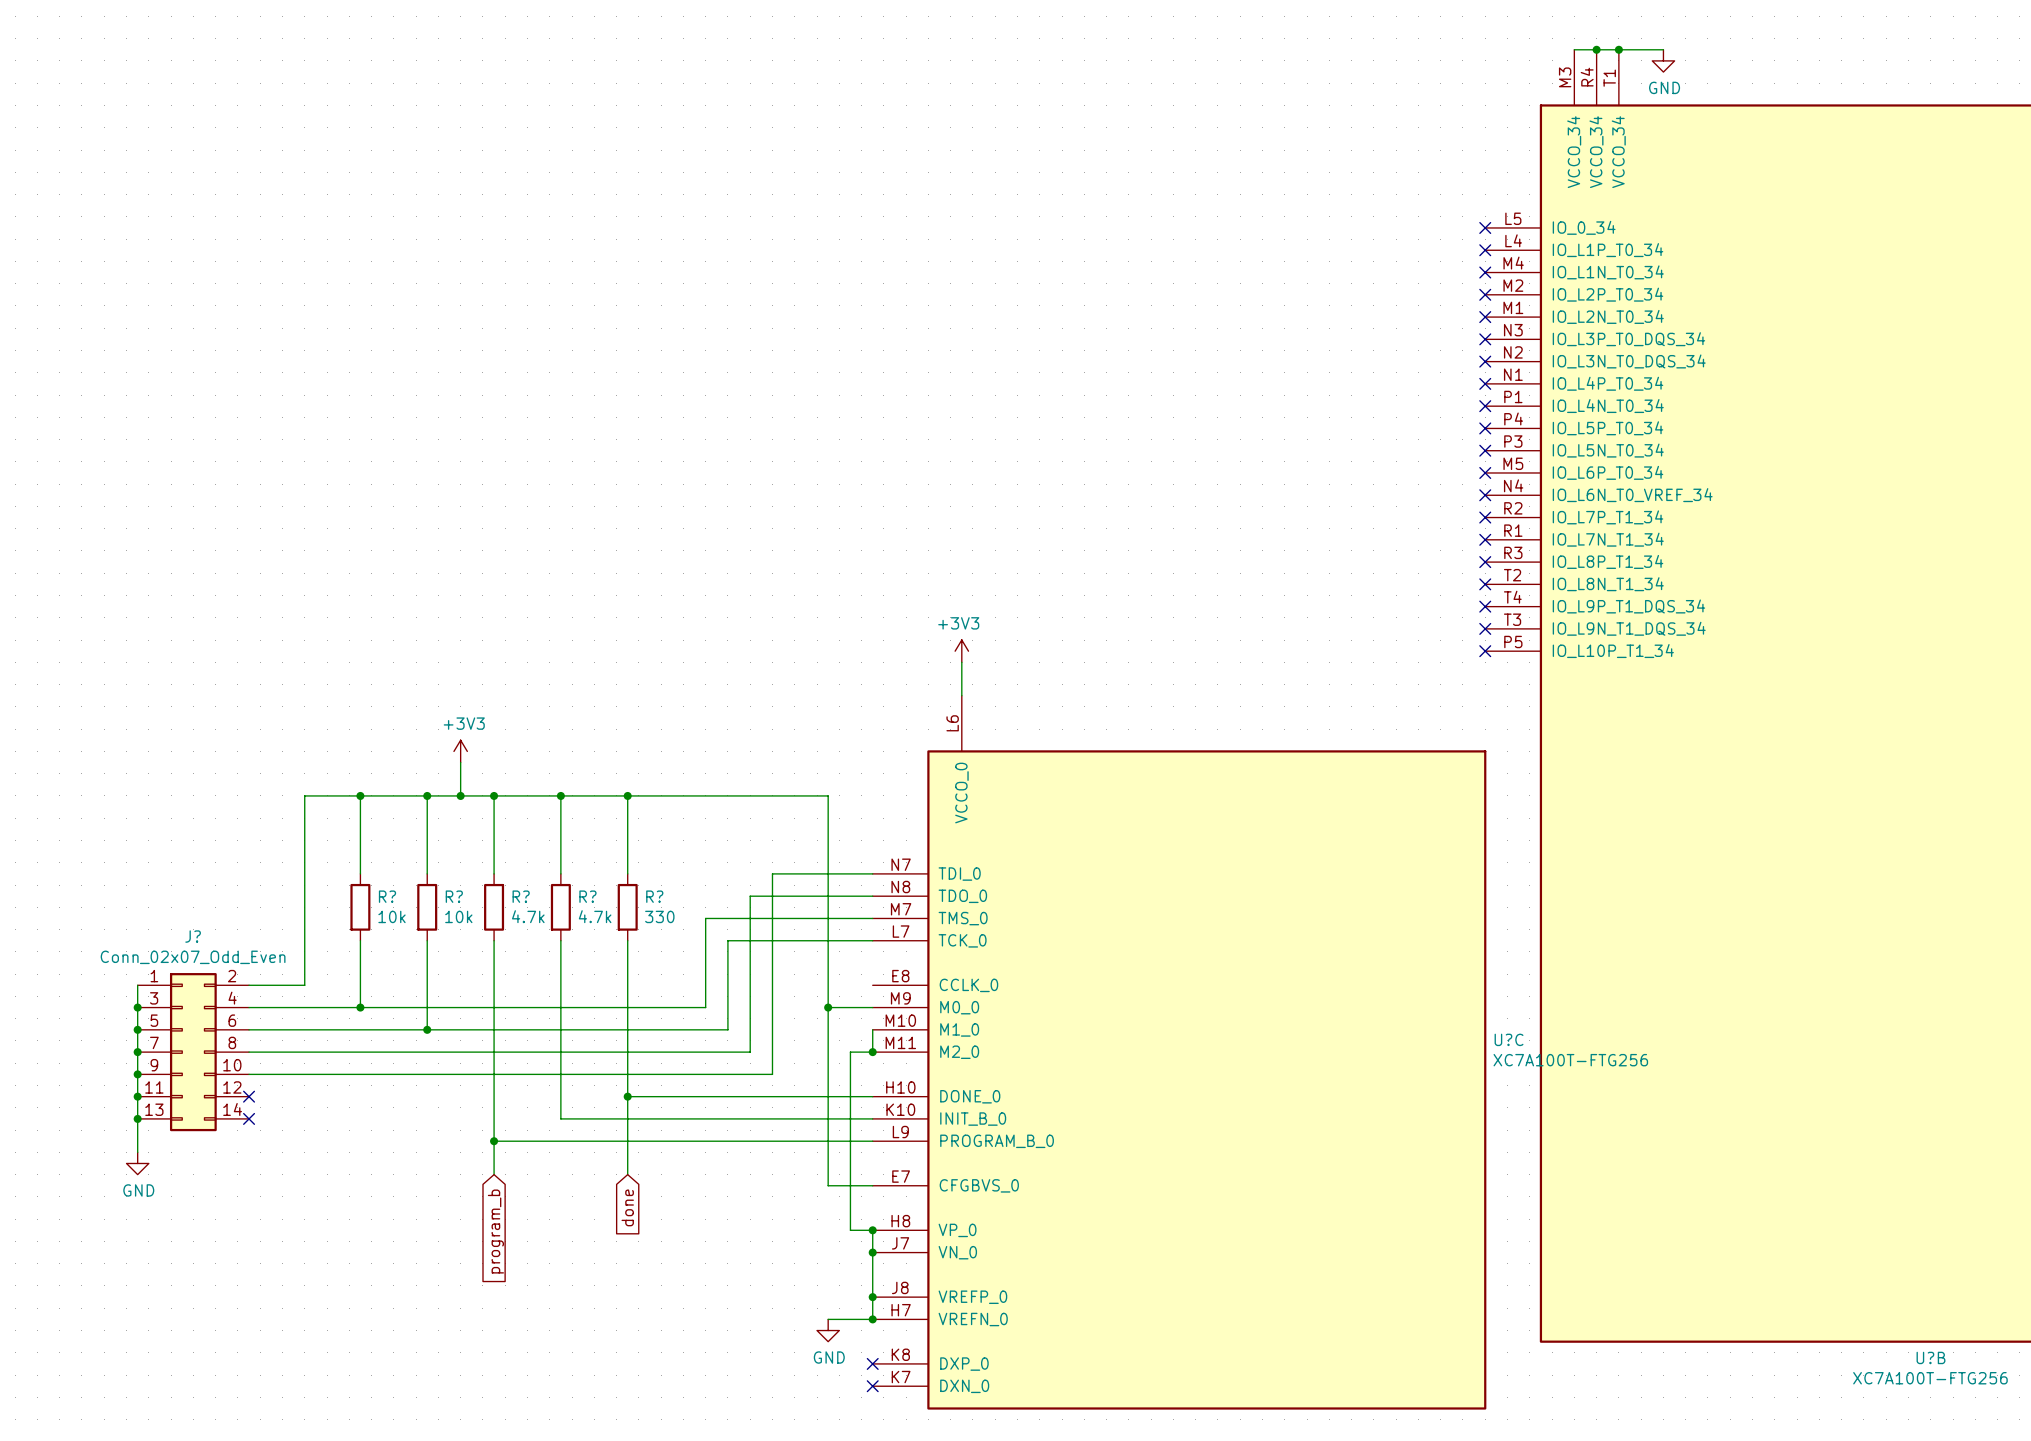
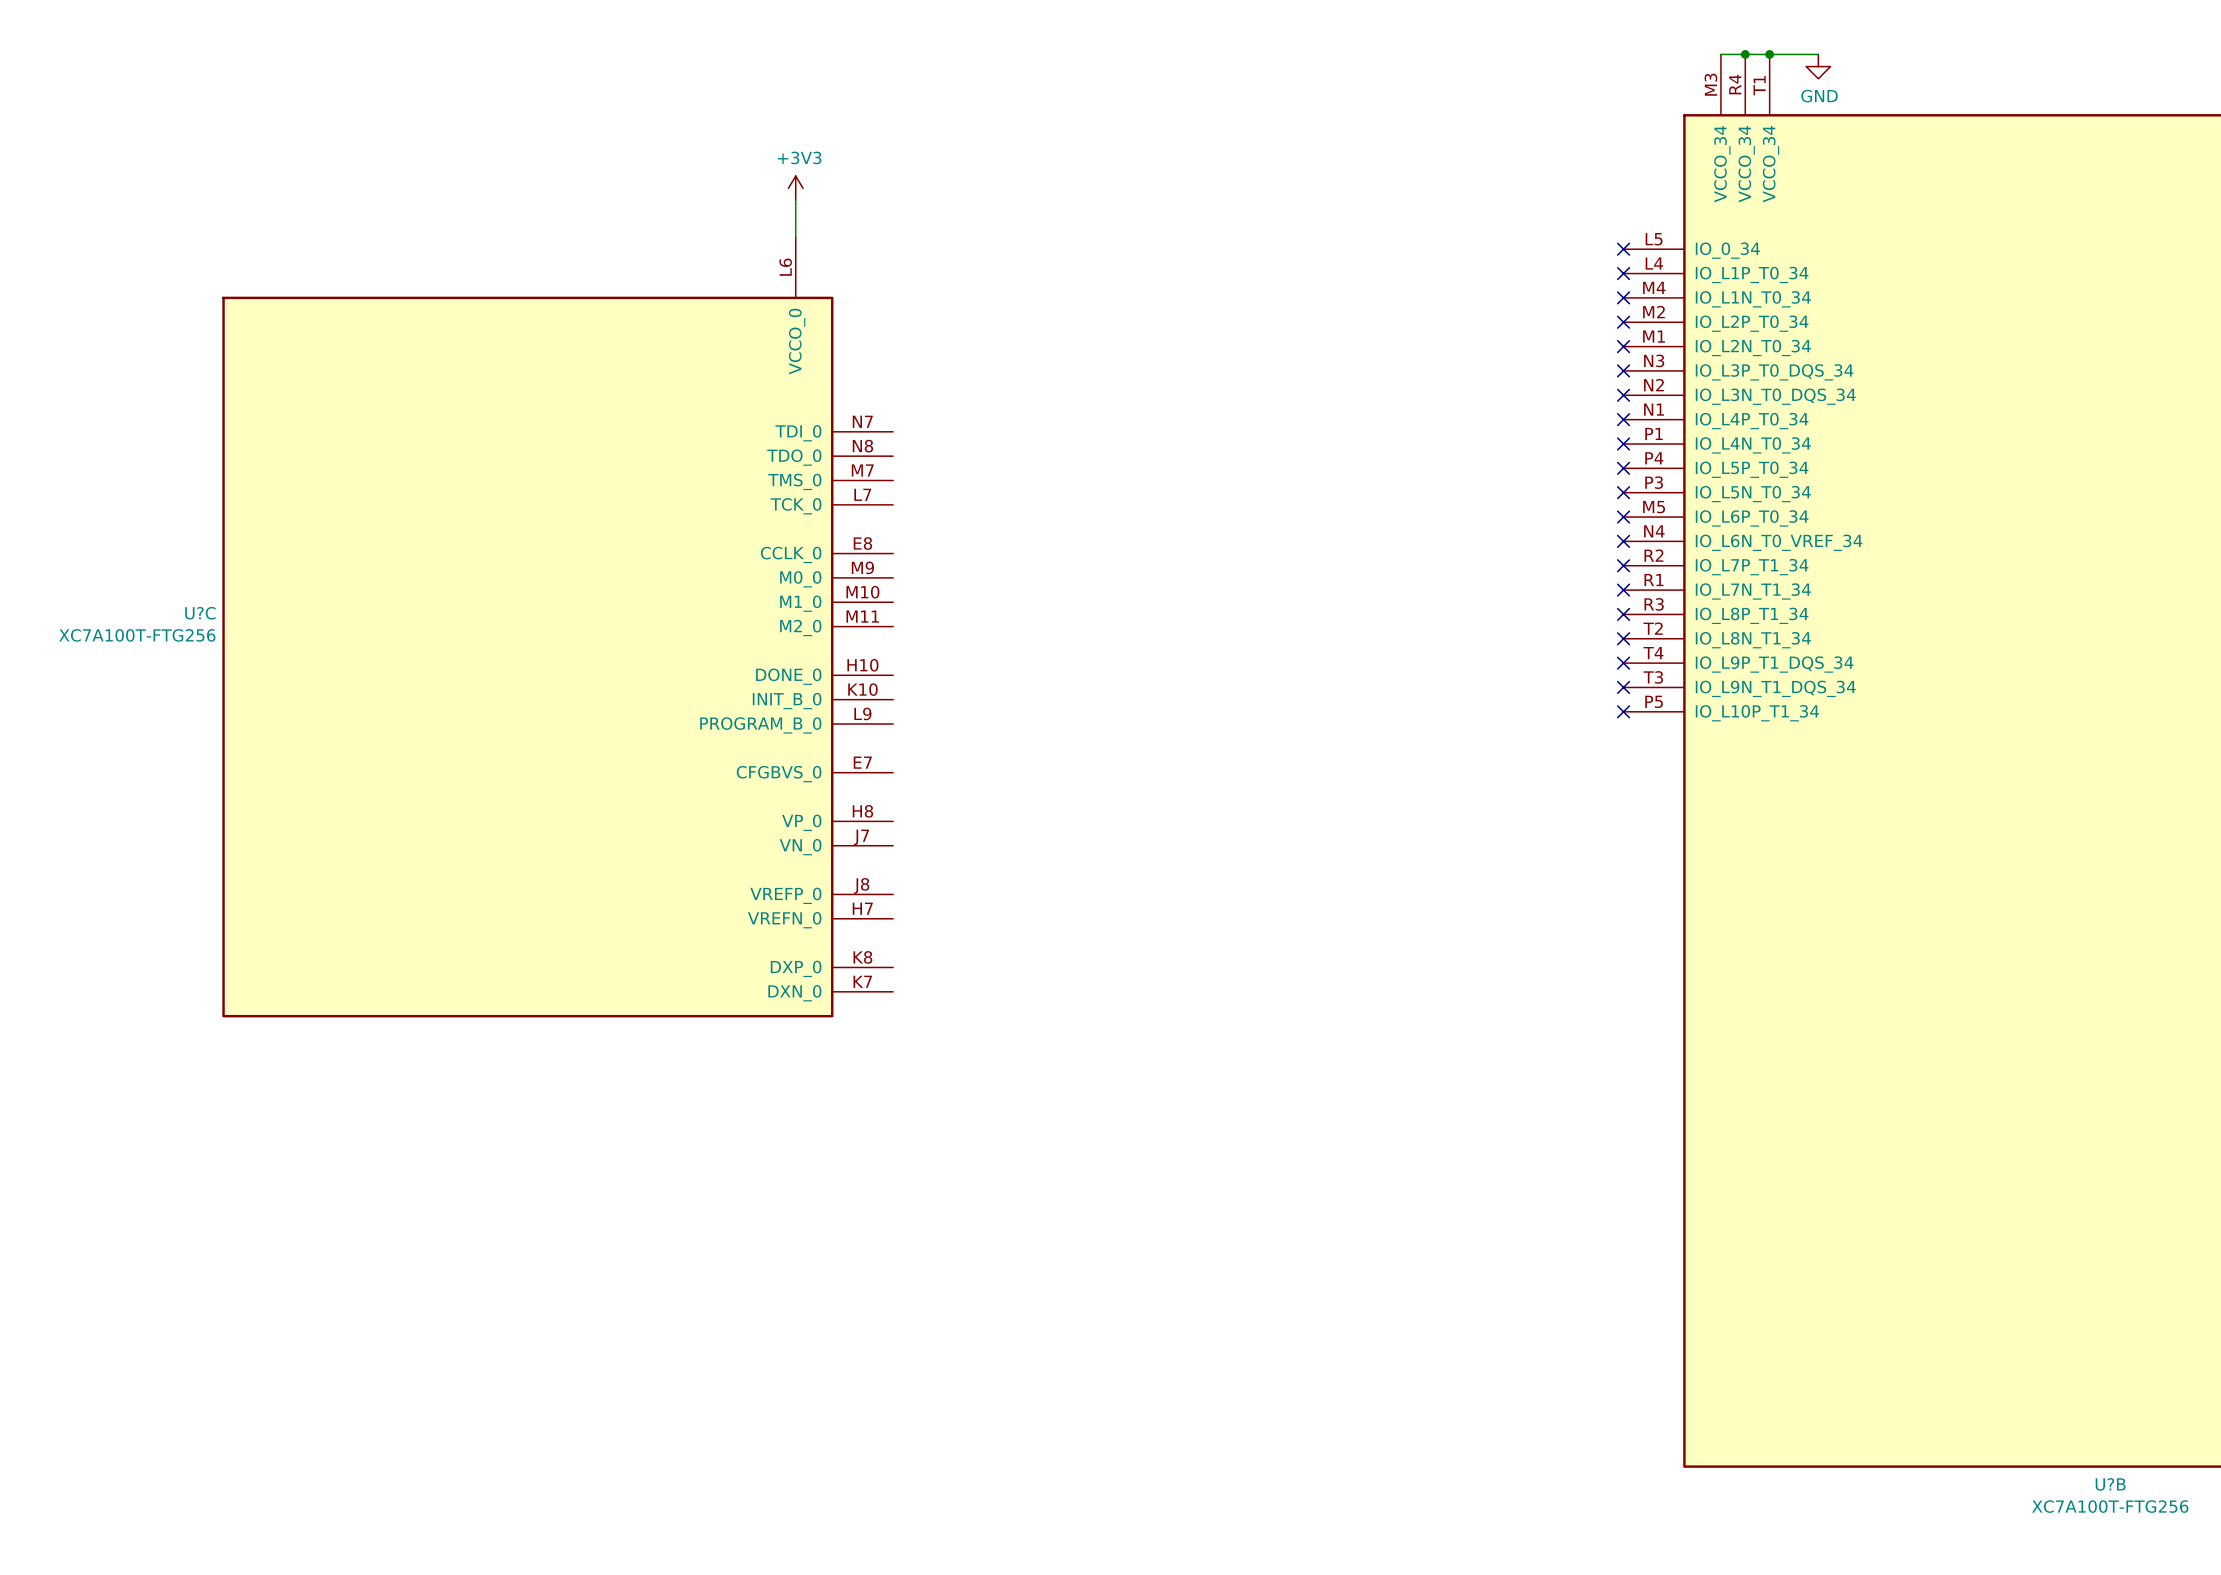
power symbol: none -> +3V3 (795, 188)
wire: none -> (795, 200) (795, 237)
U?C: none -> XC7A100T-FTG256 (557, 627)
power symbol: +3V3 (961, 651) -> none
wire: (961, 662) (961, 695) -> none
power symbol: +3V3 (460, 751) -> none
junction: (360, 795) -> none
junction: (427, 795) -> none
junction: (460, 795) -> none
junction: (494, 795) -> none
junction: (560, 795) -> none
junction: (627, 795) -> none
wire: (872, 873) (772, 873) (772, 1074) (249, 1074) -> none
wire: (872, 896) (750, 896) (750, 1052) (249, 1052) -> none
R?: 10k (360, 907) -> none
R?: 10k (427, 907) -> none
R?: 4.7k (494, 907) -> none
R?: 4.7k (560, 907) -> none
R?: 330 (627, 907) -> none
wire: (872, 918) (705, 918) (705, 1007) (249, 1007) -> none
wire: (360, 940) (360, 1007) -> none
wire: (427, 940) (427, 1029) -> none
wire: (494, 940) (494, 1174) -> none
wire: (560, 940) (560, 1118) (872, 1118) -> none
wire: (627, 940) (627, 1174) -> none
wire: (872, 940) (727, 940) (727, 1029) (249, 1029) -> none
wire: (137, 985) (137, 1152) -> none
wire: (249, 985) (304, 985) (304, 795) (828, 795) (828, 1185) (872, 1185) -> none
junction: (137, 1007) -> none
junction: (360, 1007) -> none
wire: (828, 1007) (872, 1007) -> none
junction: (828, 1007) -> none
junction: (137, 1029) -> none
junction: (427, 1029) -> none
wire: (872, 1029) (872, 1052) (850, 1052) (850, 1230) (872, 1230) (872, 1319) (828, 1319) -> none
junction: (137, 1052) -> none
J?: Conn_02x07_Odd_Even (193, 1052) -> none
junction: (872, 1052) -> none
U?C: XC7A100T-FTG256 (1179, 1052) -> none
junction: (137, 1074) -> none
junction: (137, 1096) -> none
no-connect mark: (249, 1096) -> none
wire: (627, 1096) (872, 1096) -> none
junction: (627, 1096) -> none
junction: (137, 1118) -> none
no-connect mark: (249, 1118) -> none
wire: (494, 1141) (872, 1141) -> none
junction: (494, 1141) -> none
power symbol: GND (137, 1163) -> none
global label: done (627, 1207) -> none
junction: (872, 1230) -> none
global label: program_b (495, 1231) -> none
junction: (872, 1252) -> none
junction: (872, 1297) -> none
junction: (872, 1319) -> none
power symbol: GND (828, 1330) -> none
no-connect mark: (872, 1363) -> none
no-connect mark: (872, 1386) -> none

